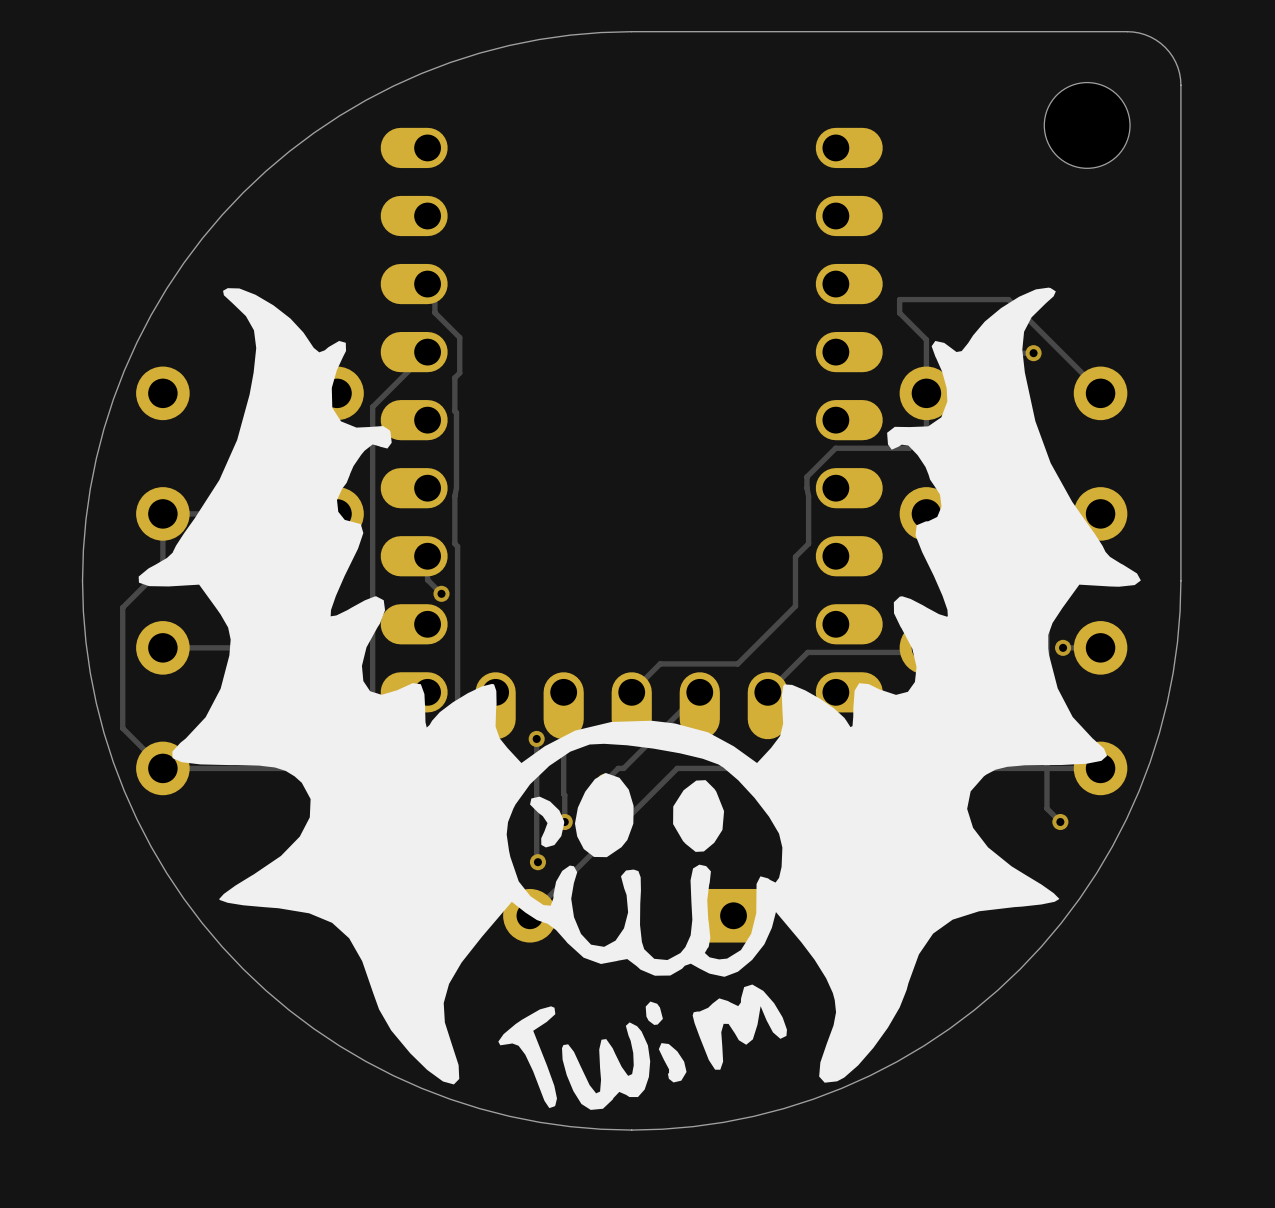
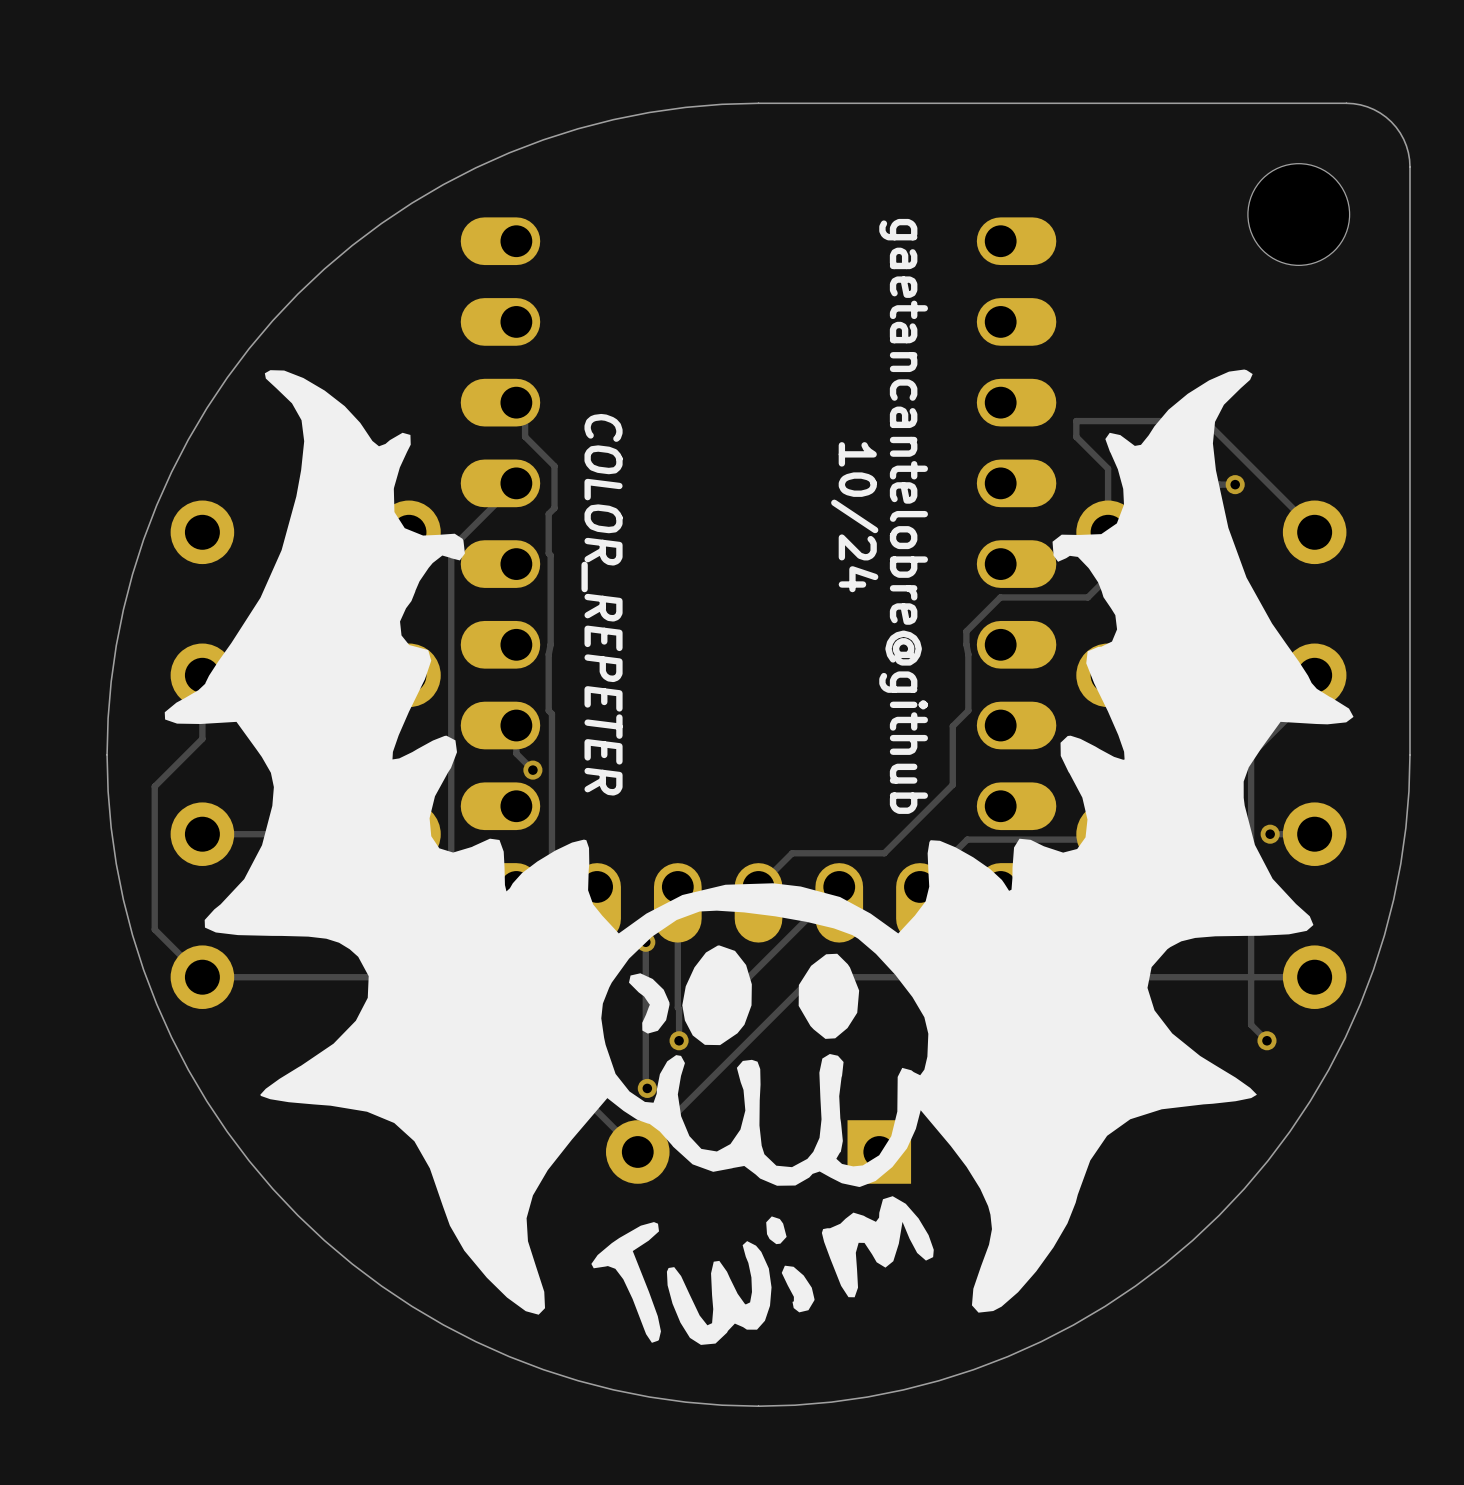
text: none -> gaetancantelobre@github (903, 516)
text: none -> 10/24 (854, 517)
text: none -> COLOR_REPETER (602, 604)
drawing position: (639, 698) -> (759, 857)

